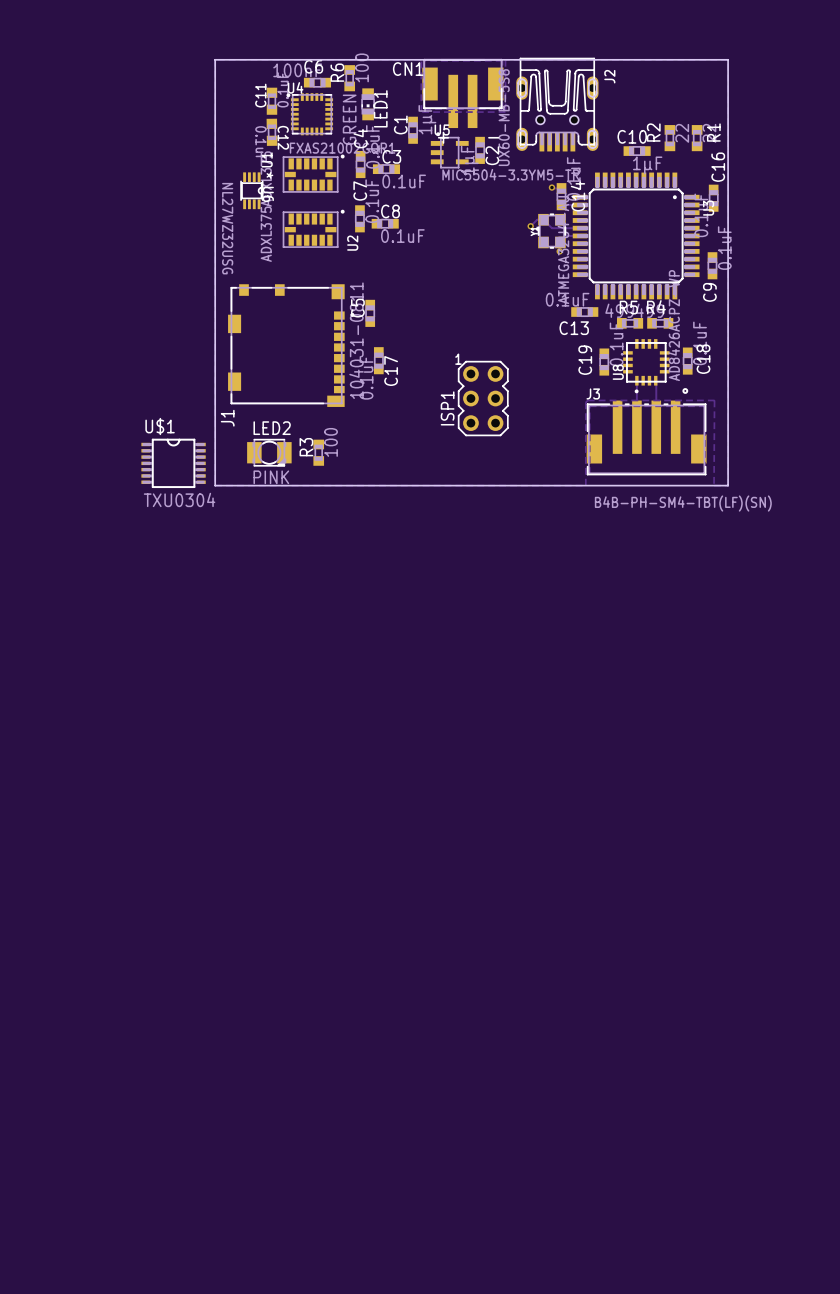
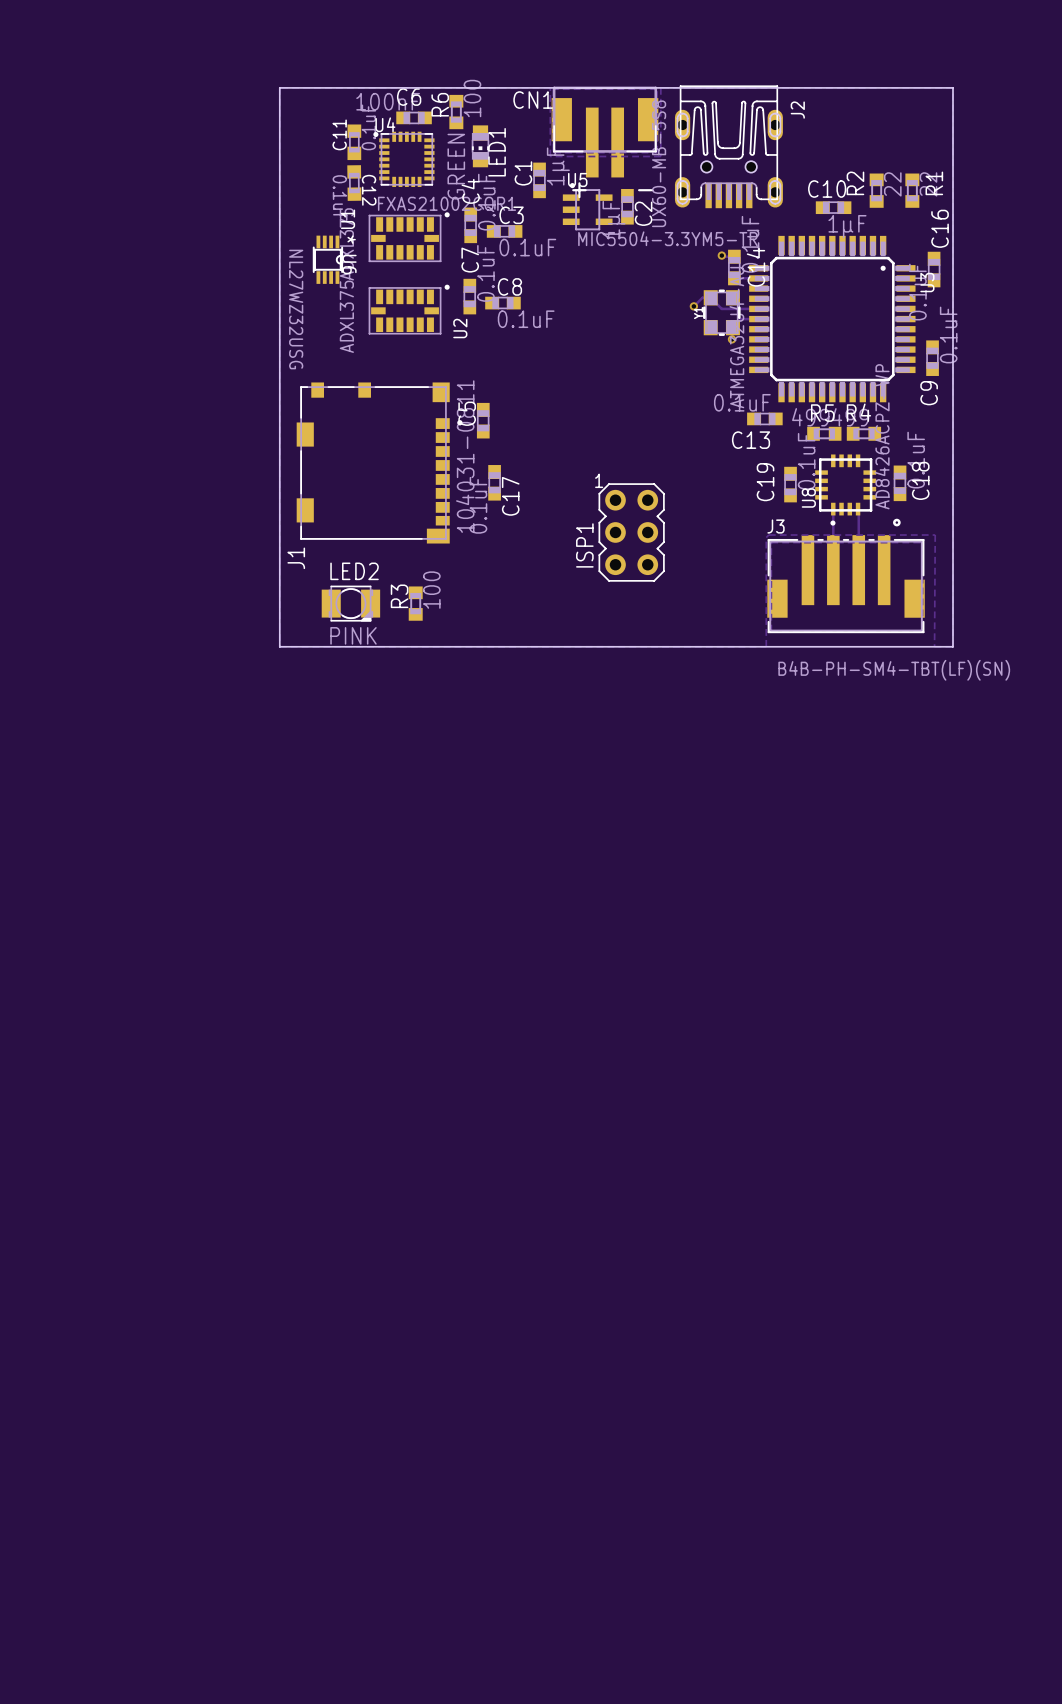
U$1: TXU0304 (173, 463) -> none

